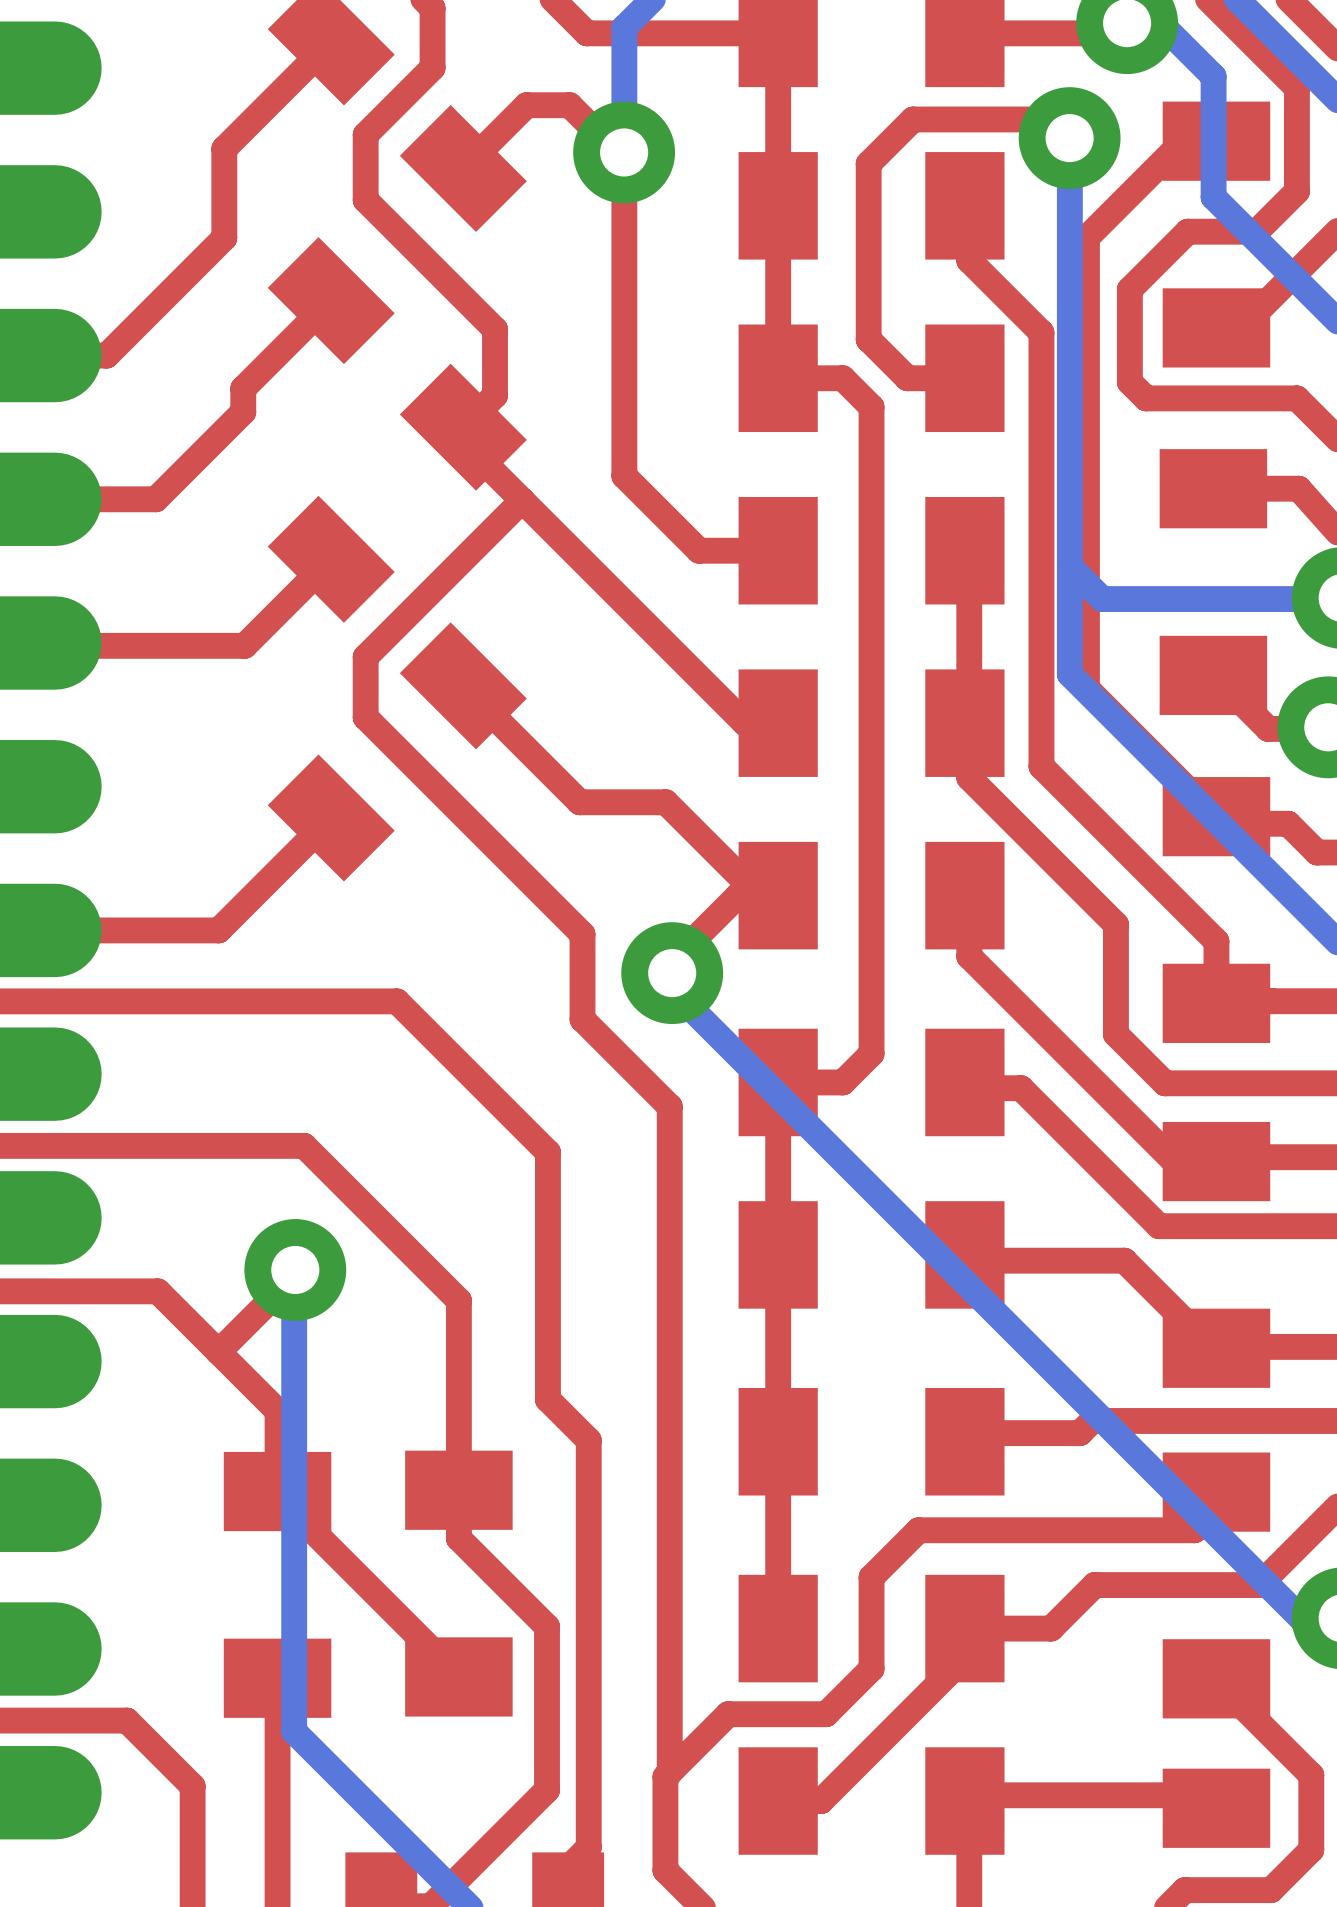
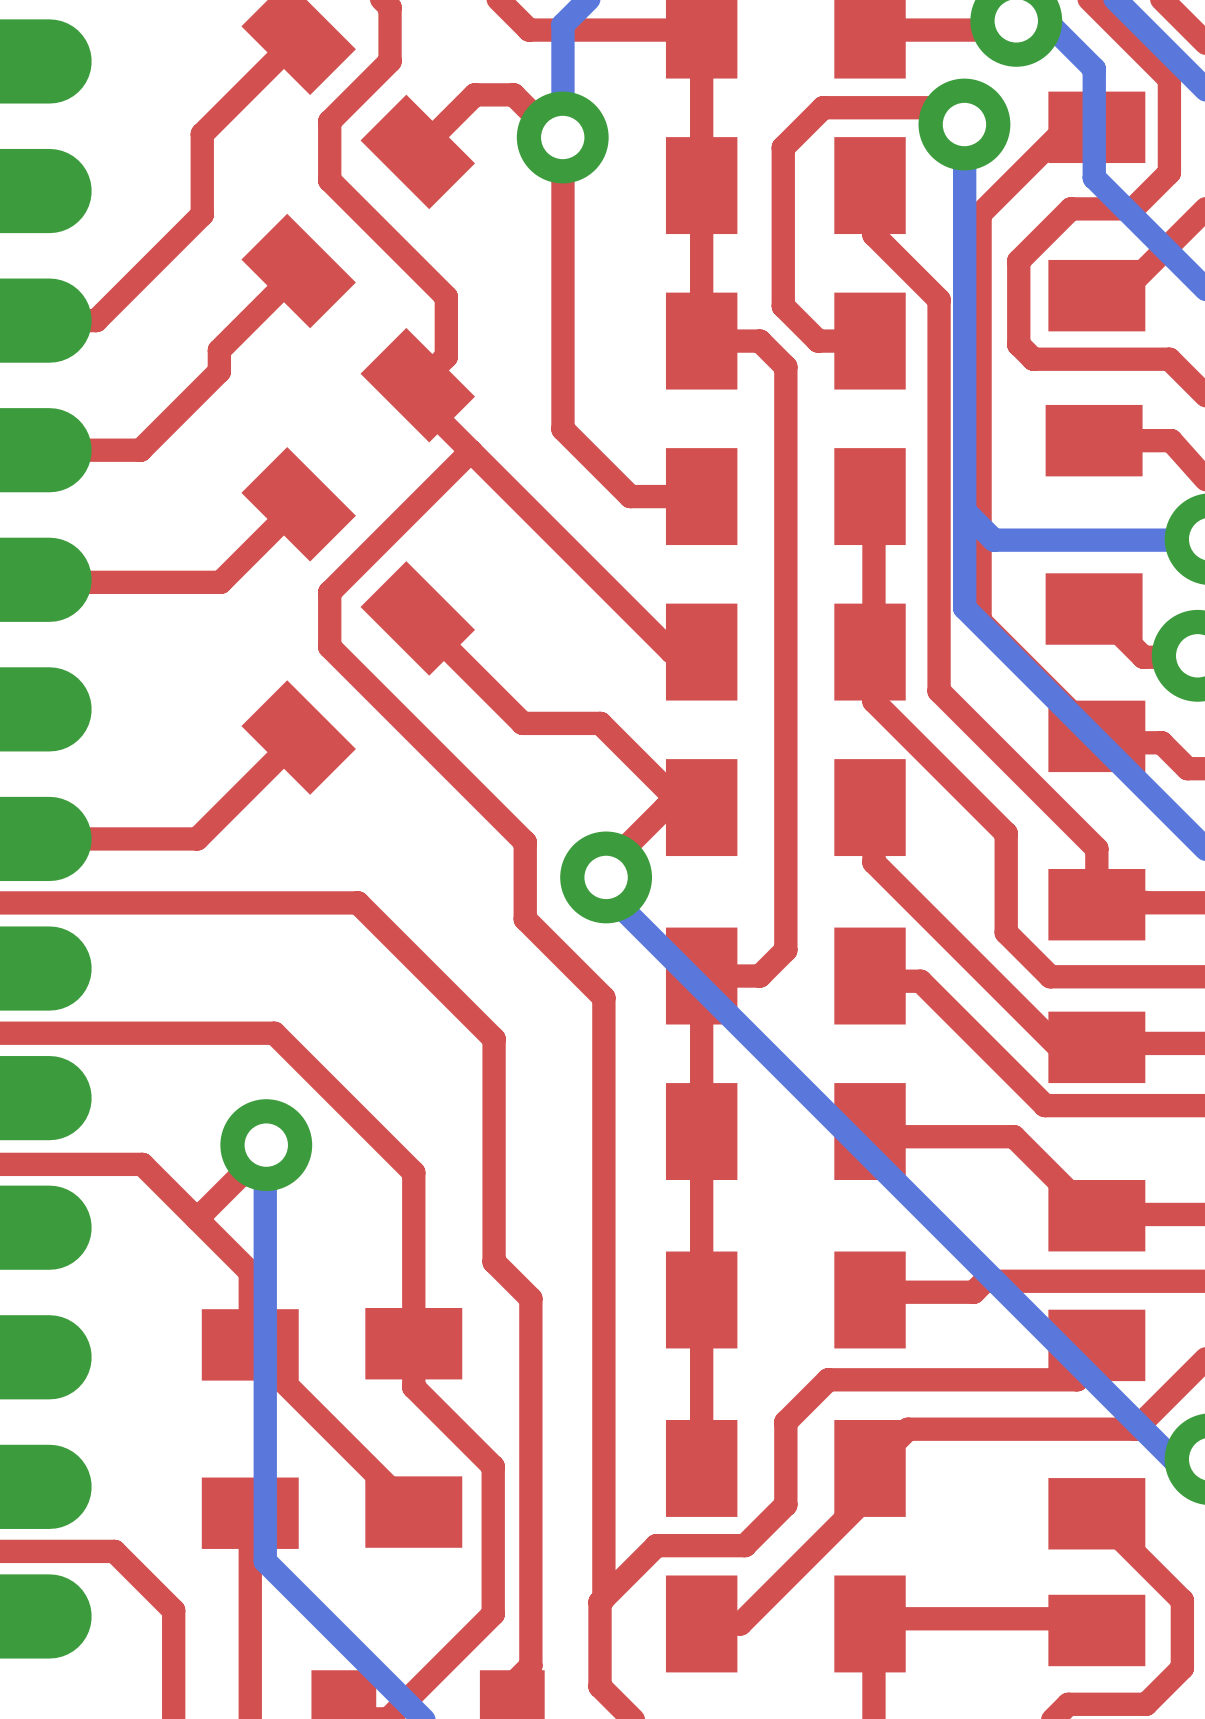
top track: (1094, 1585) (1051, 1628) (964, 1628) -> (987, 1429) (908, 1429) (870, 1468)

